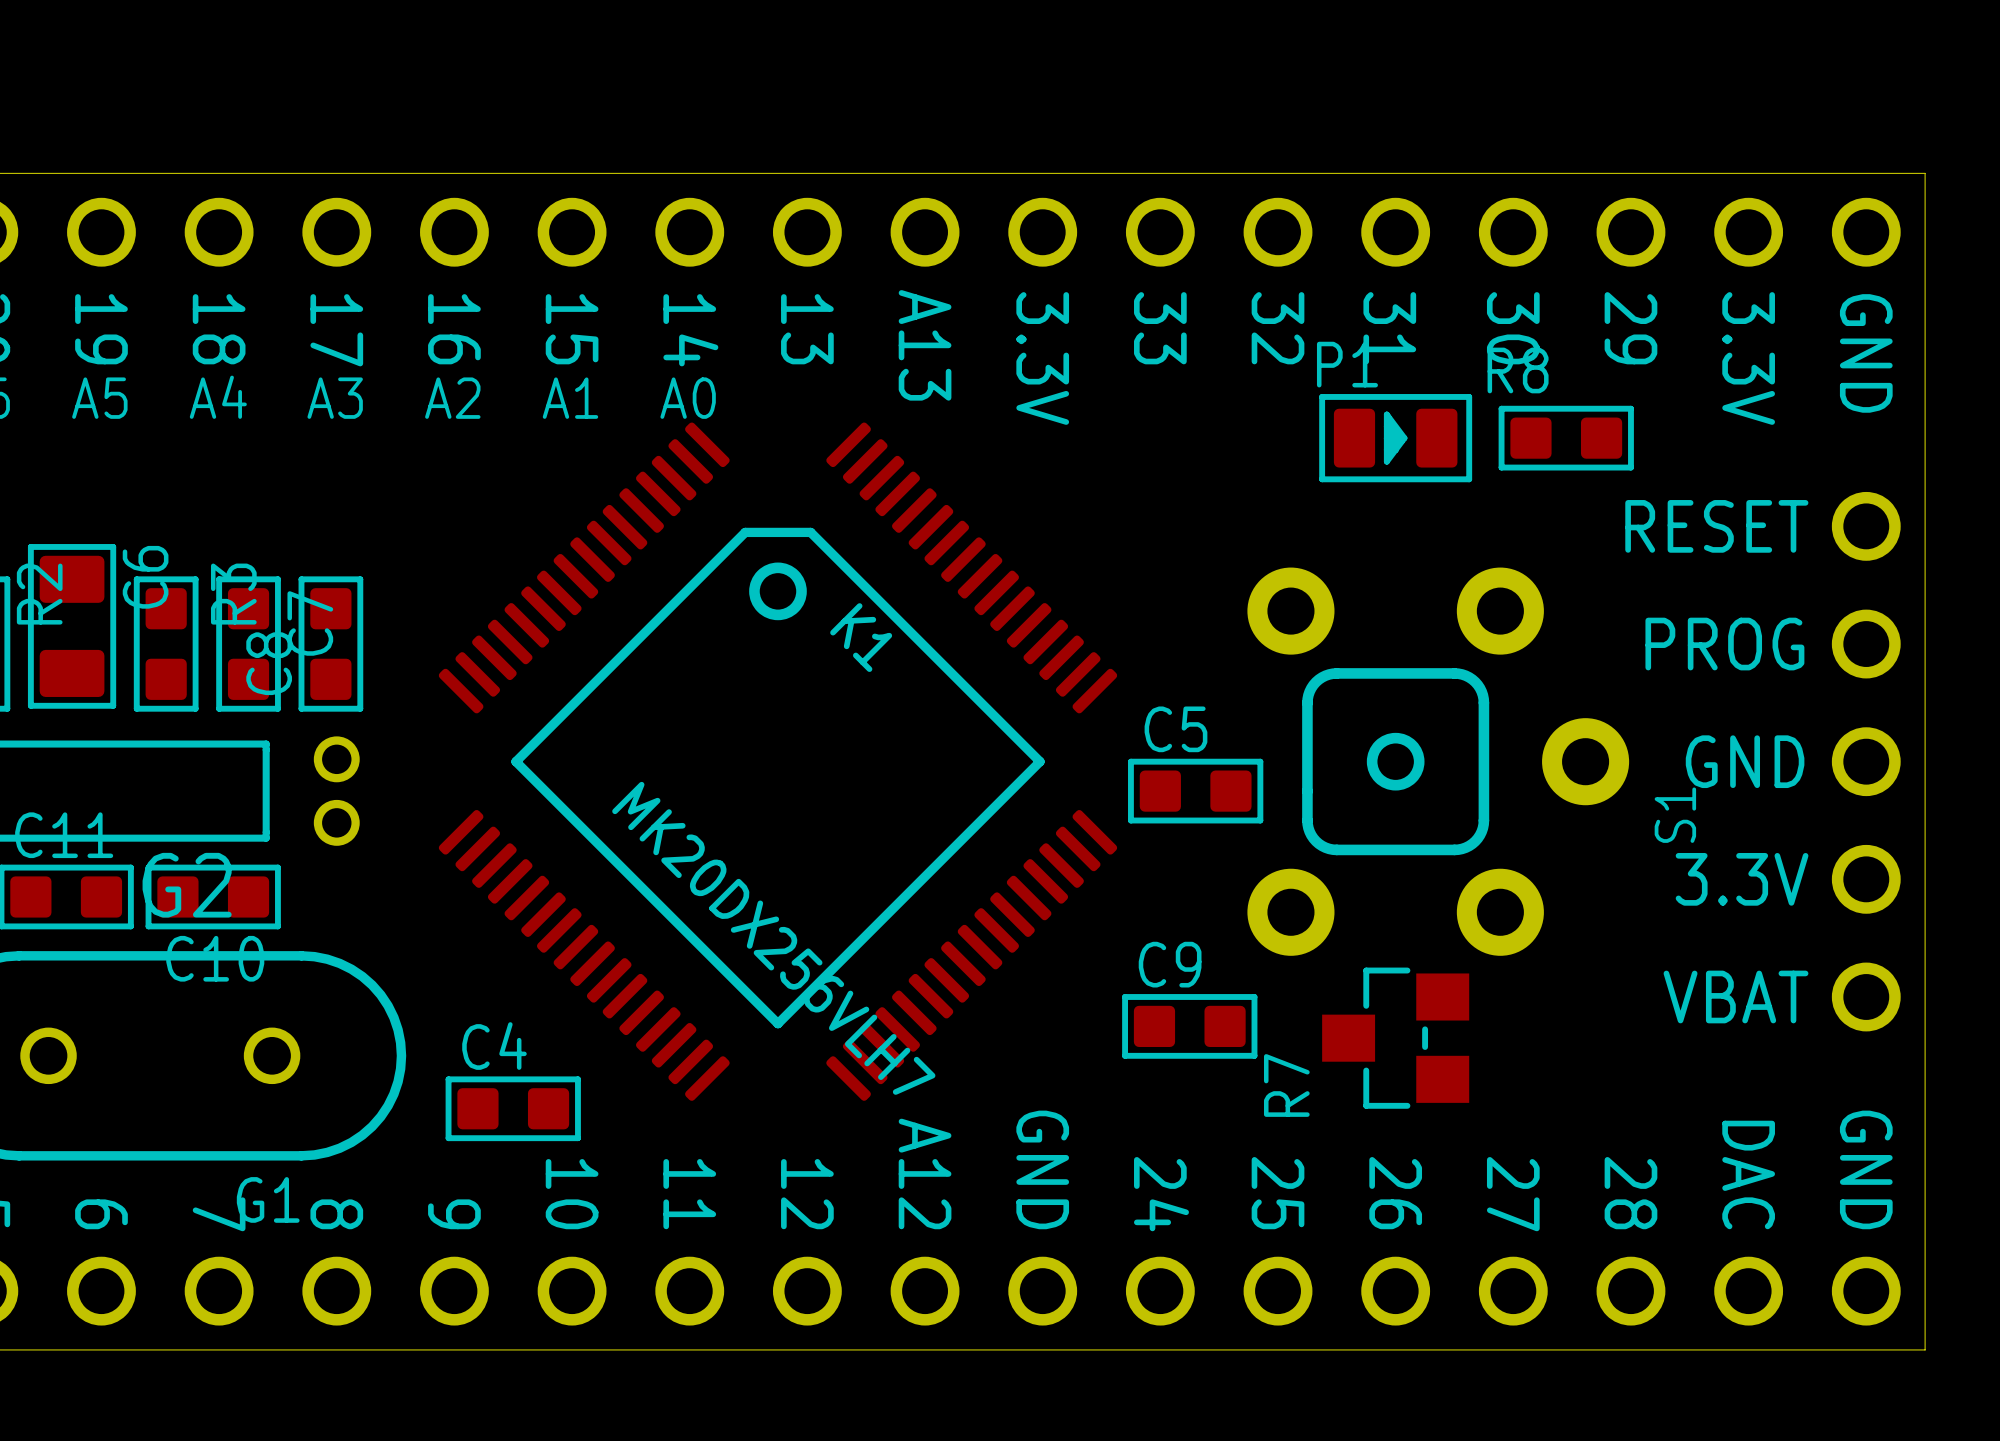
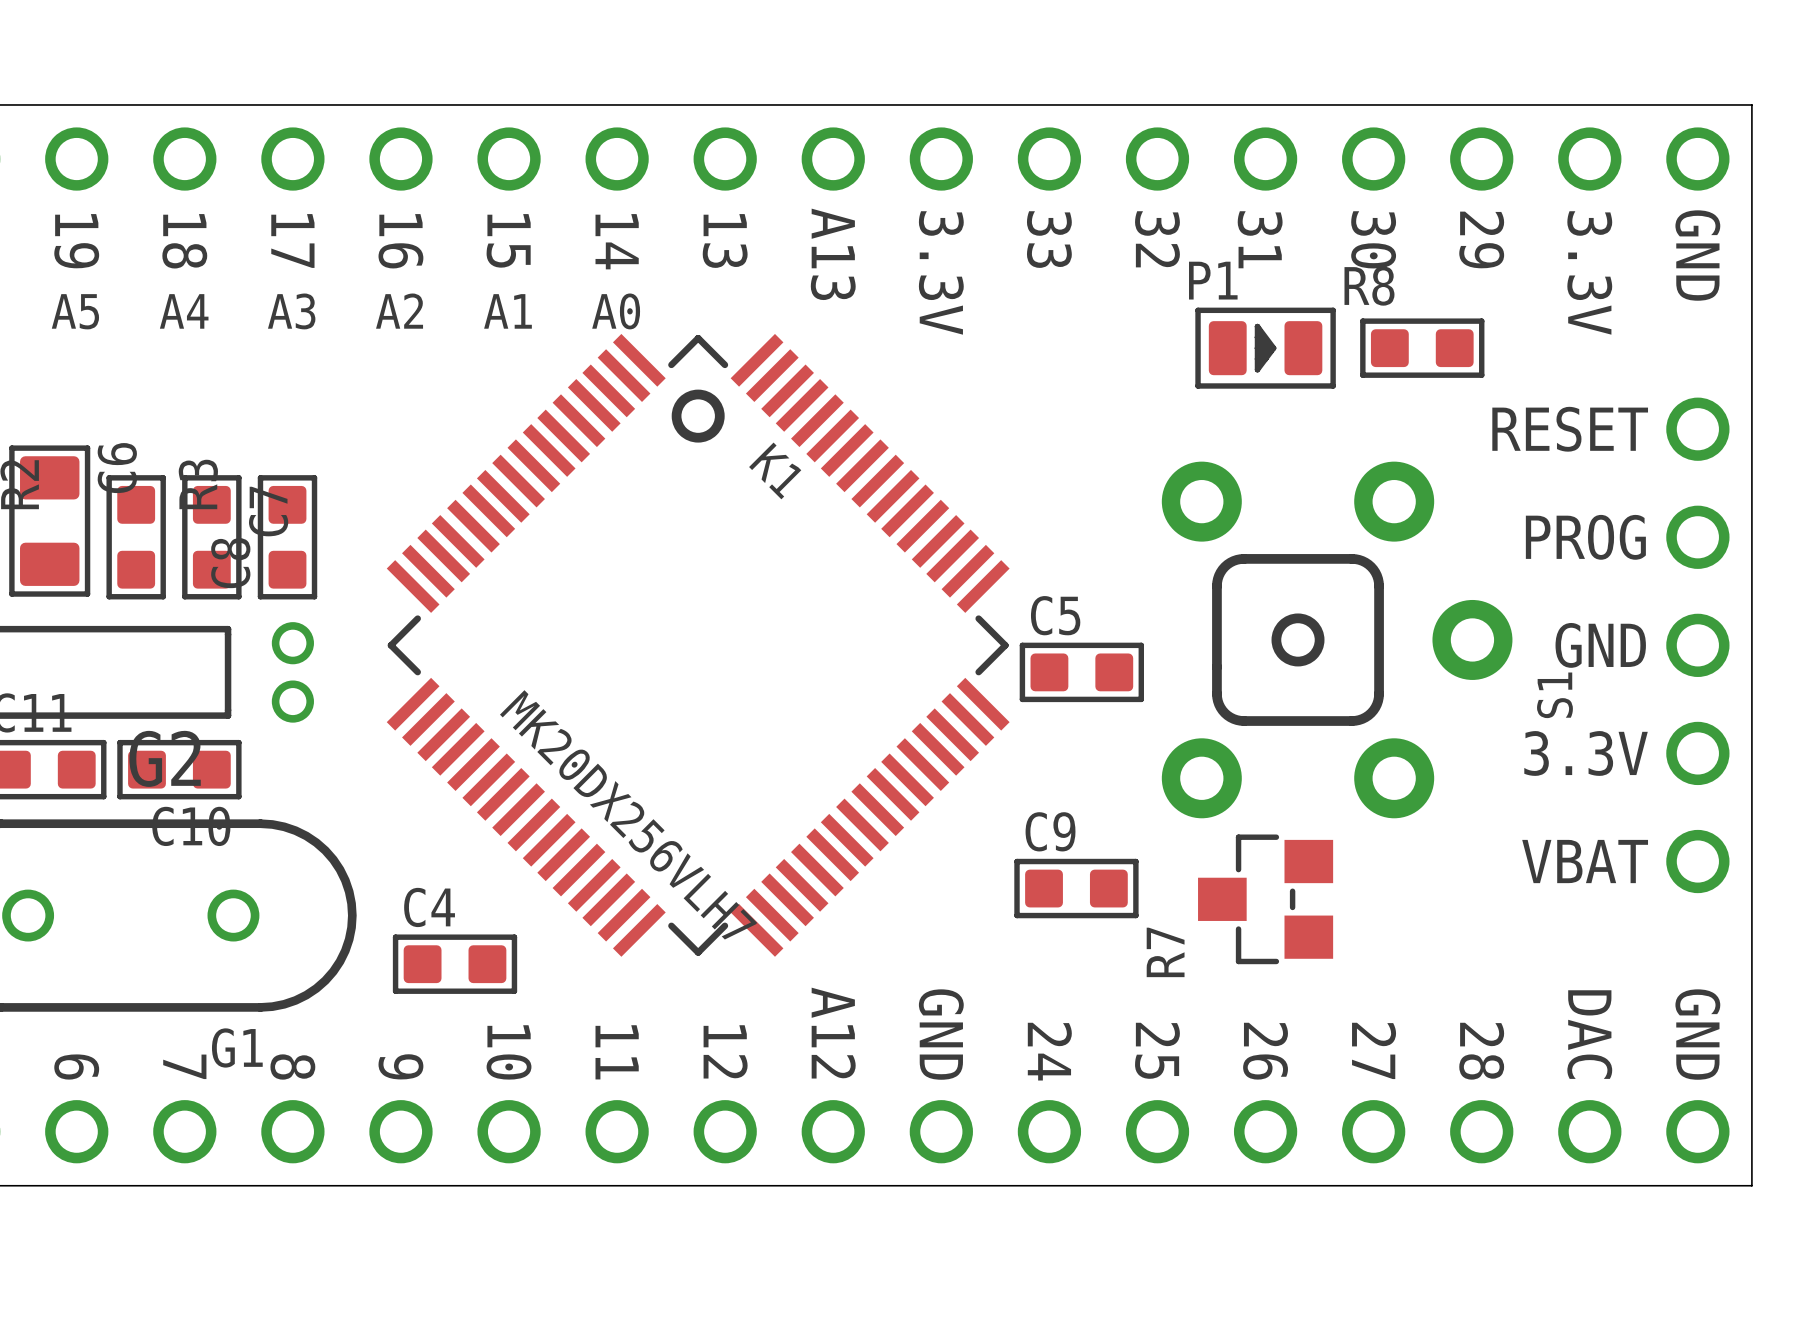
K1 footprint: [438, 422, 1118, 1101] -> [386, 333, 1010, 957]
S1 position: (1438, 761) -> (1337, 639)

